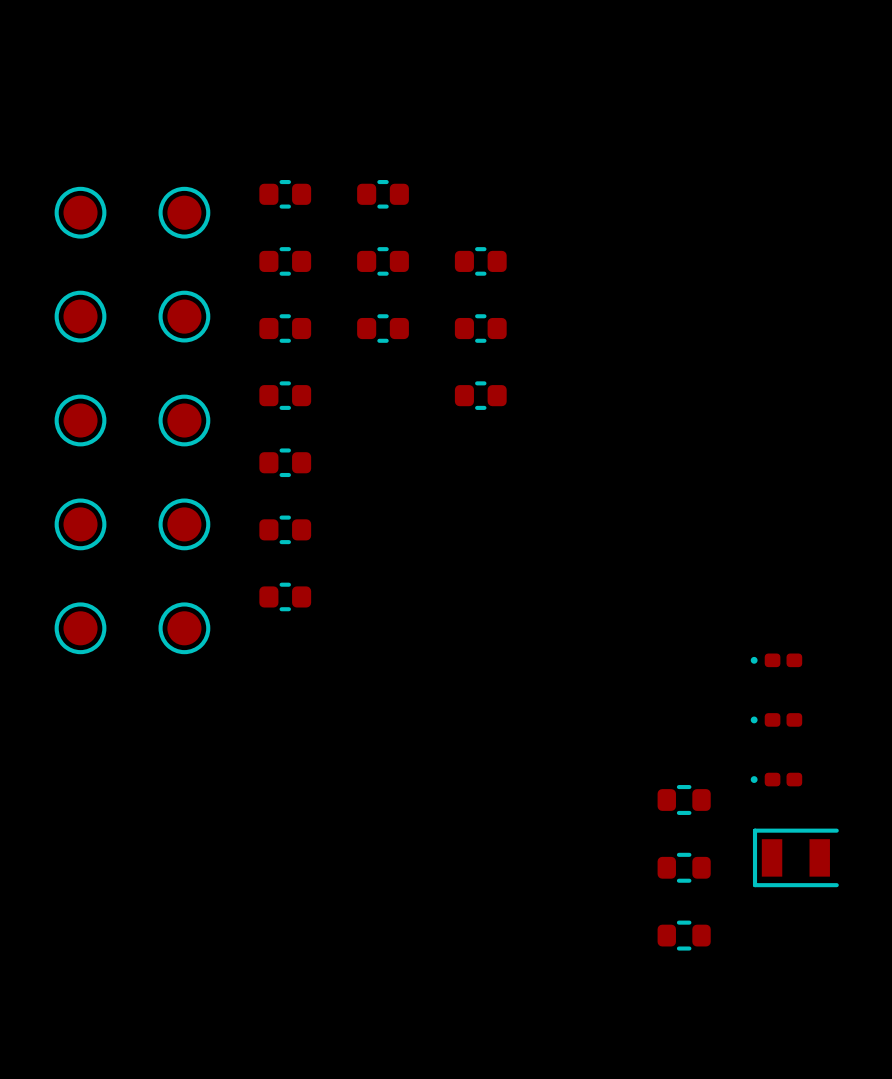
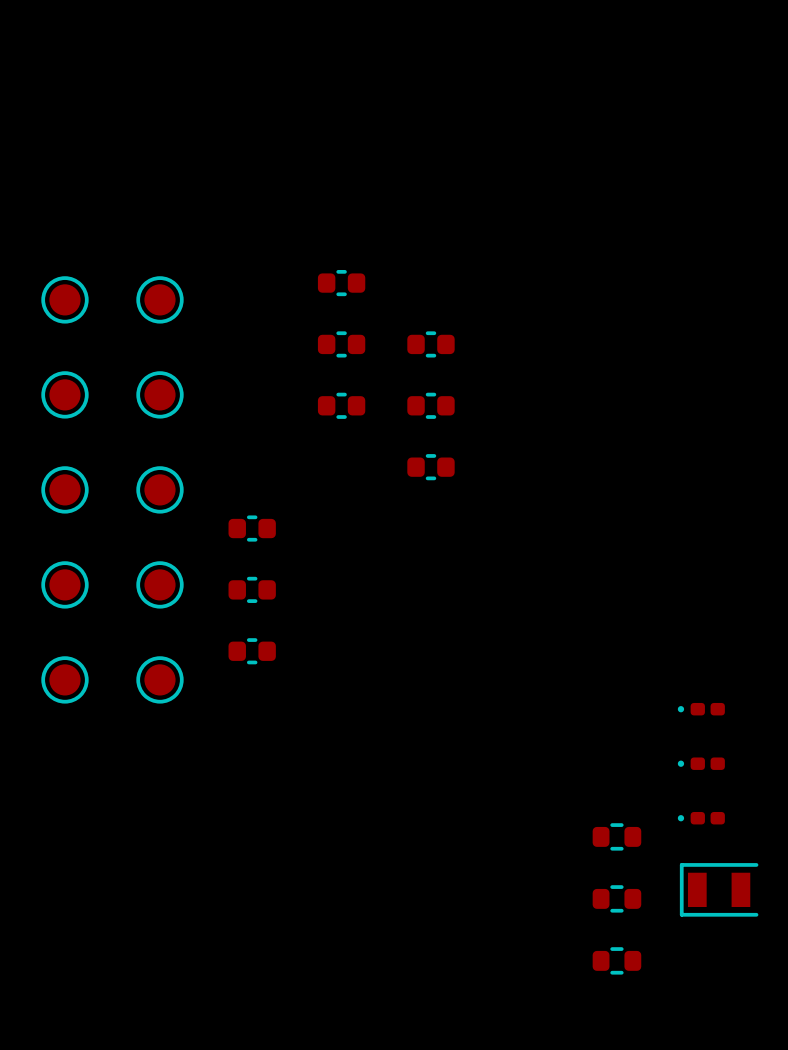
part: (285, 194) -> none
part: (285, 261) -> none
part: (285, 328) -> none
part: (285, 395) -> none

